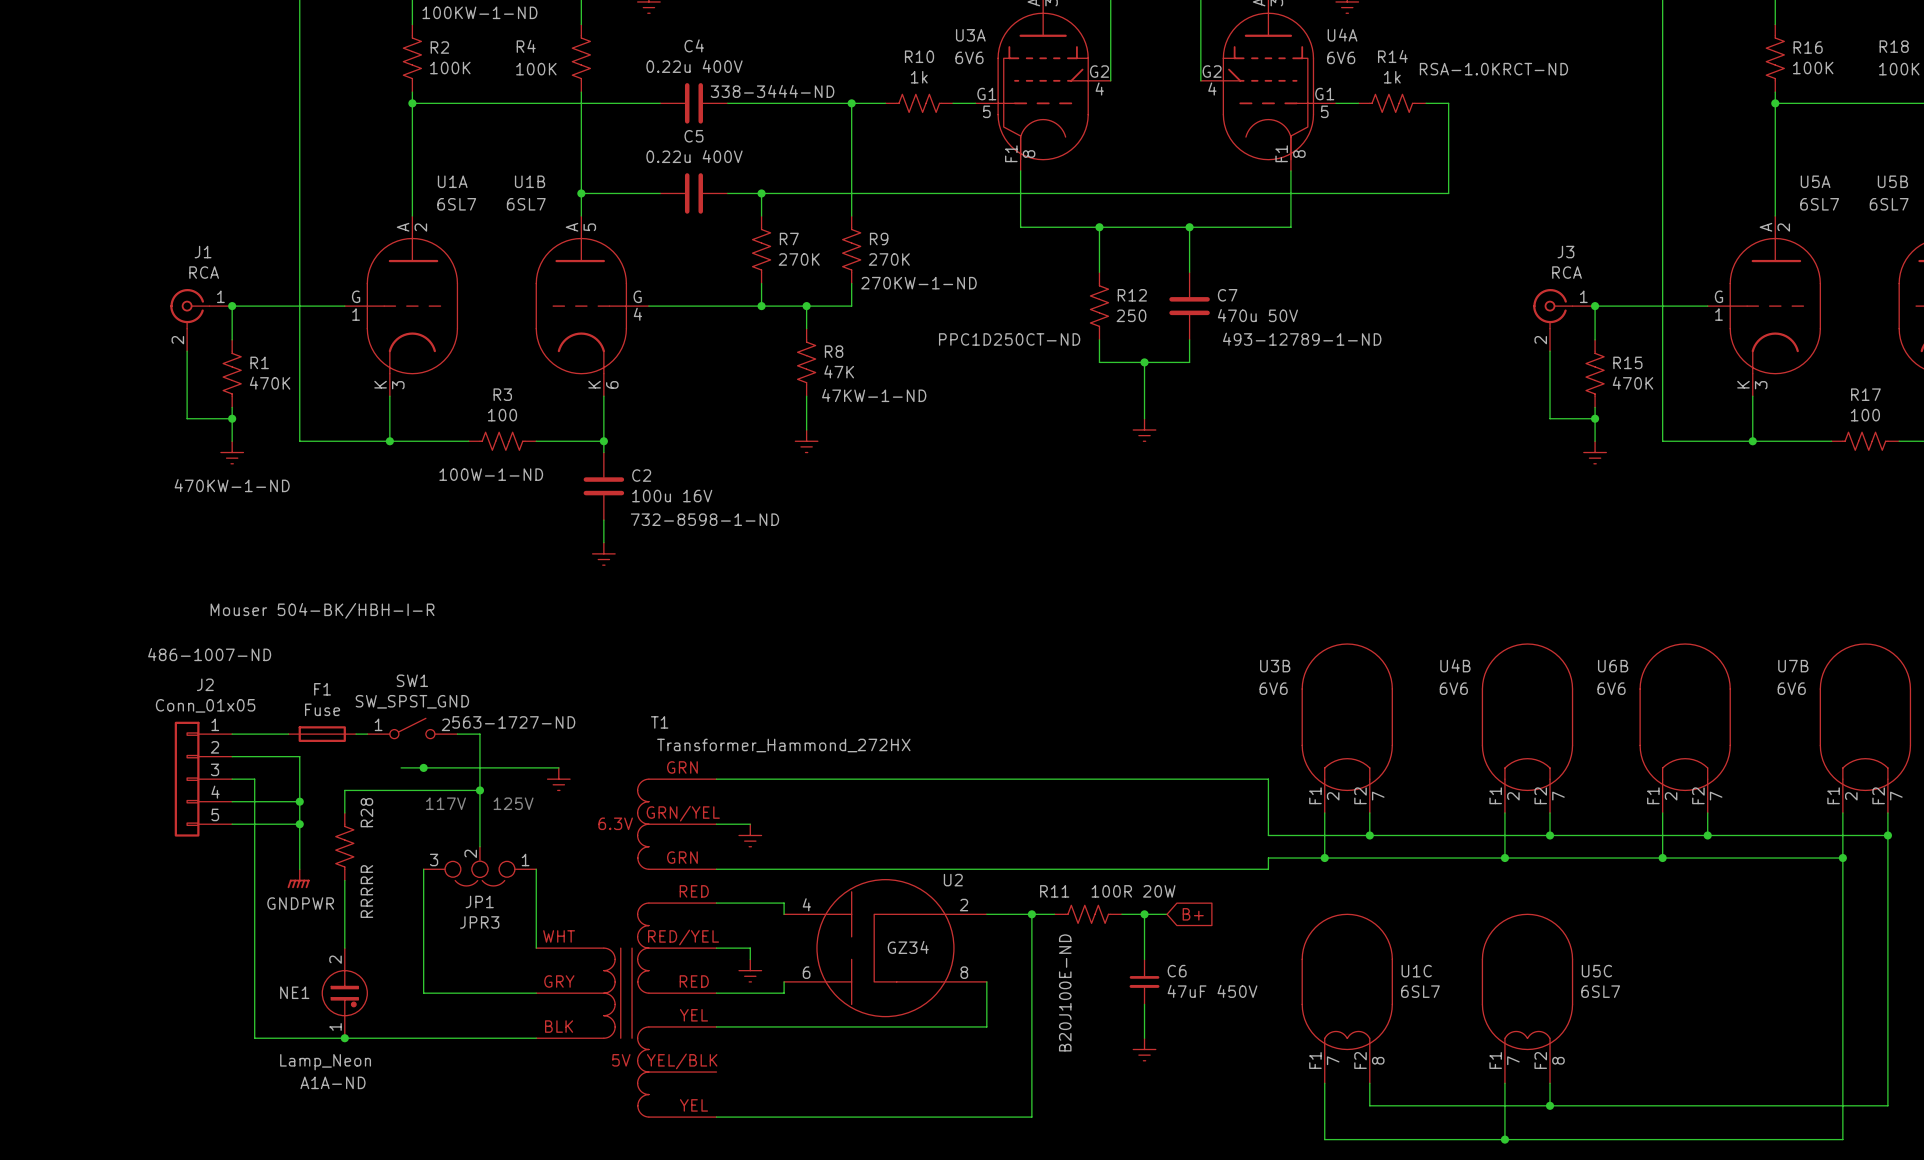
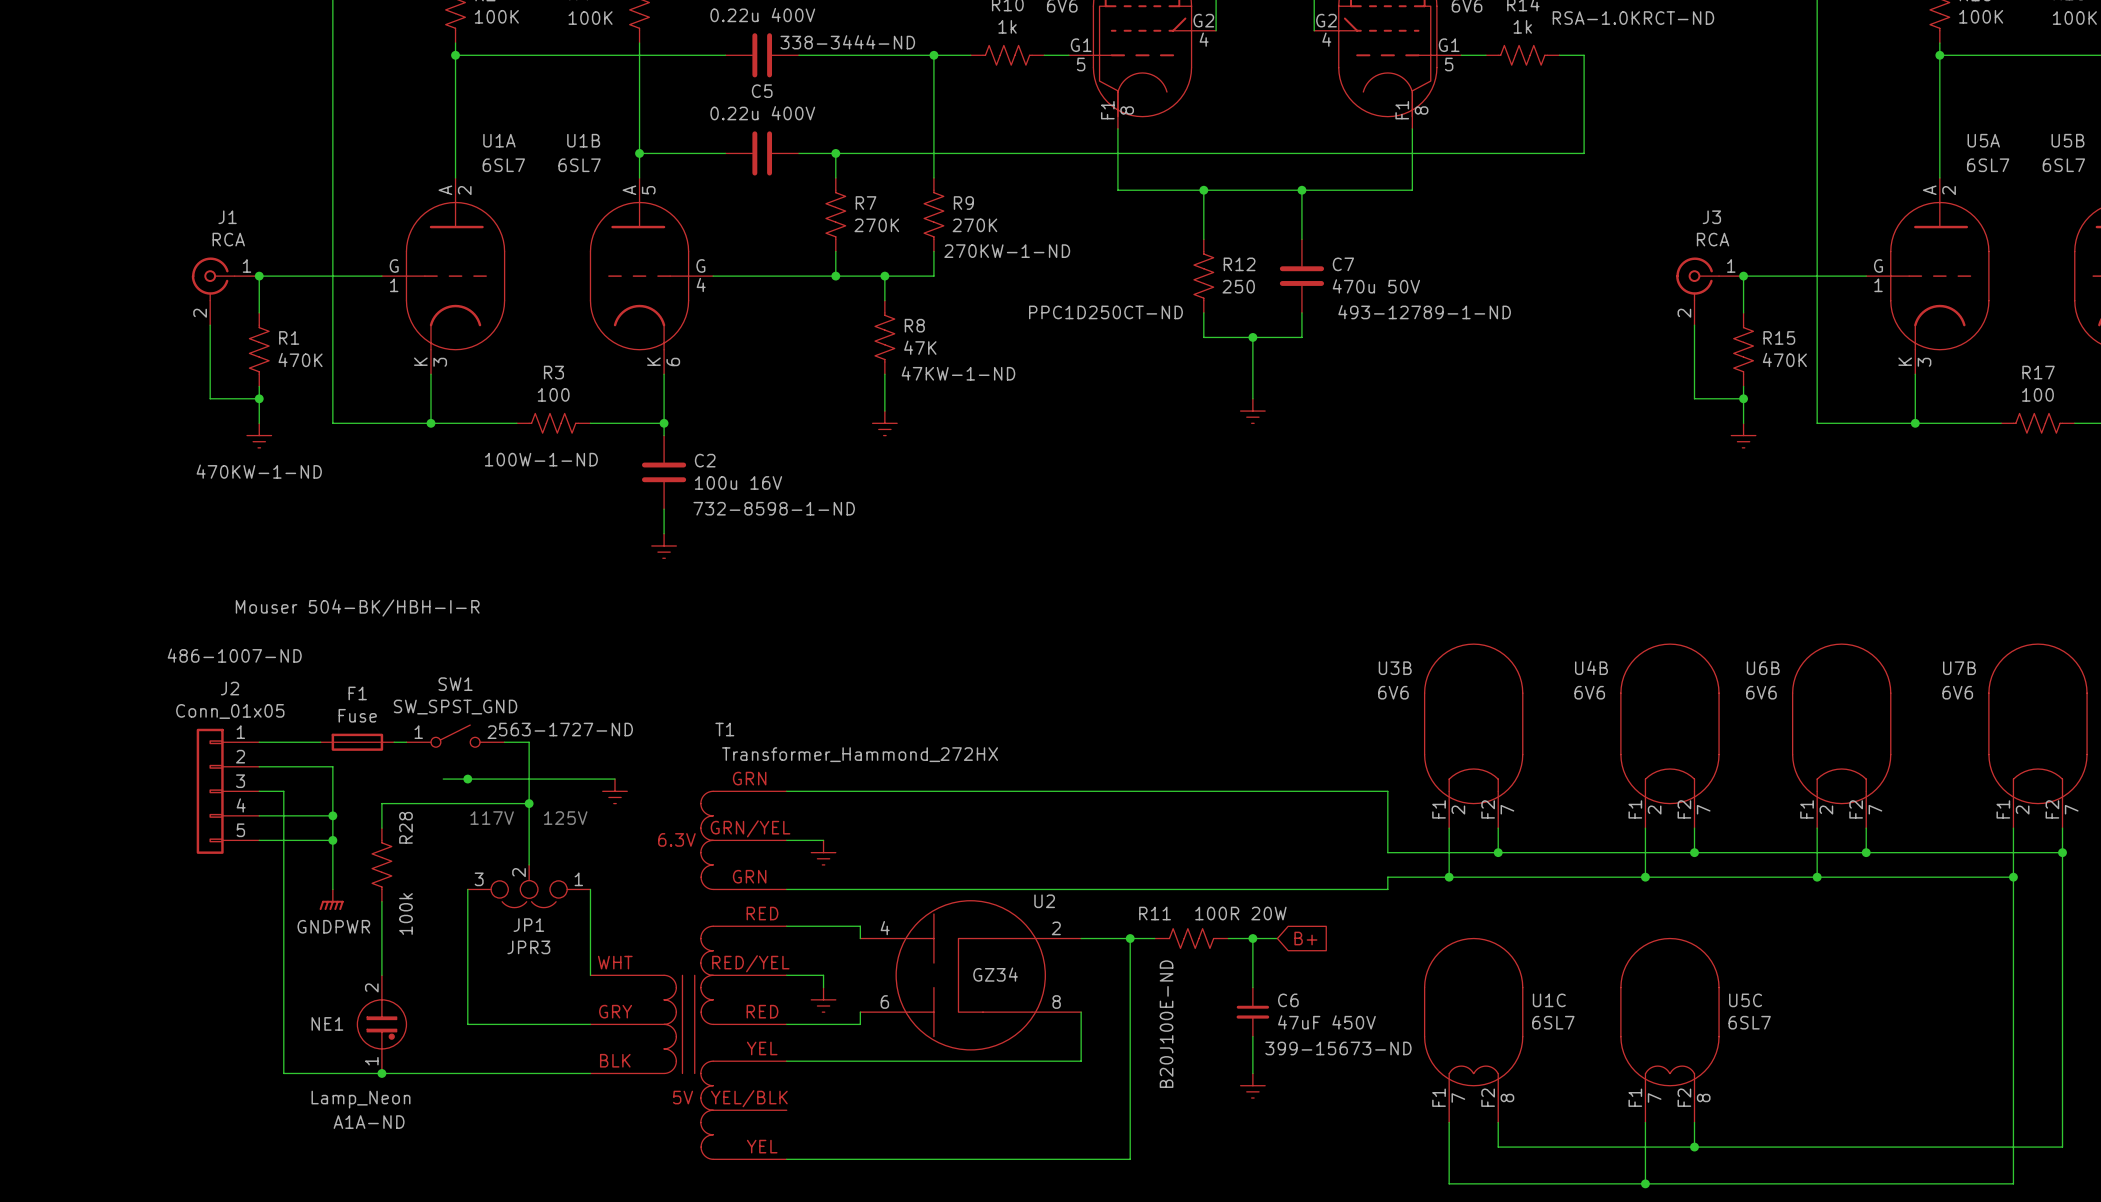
R28 value: RRRRR (366, 891) -> 100k (406, 913)
C6 text: none -> 399-15673-ND (1338, 1048)

